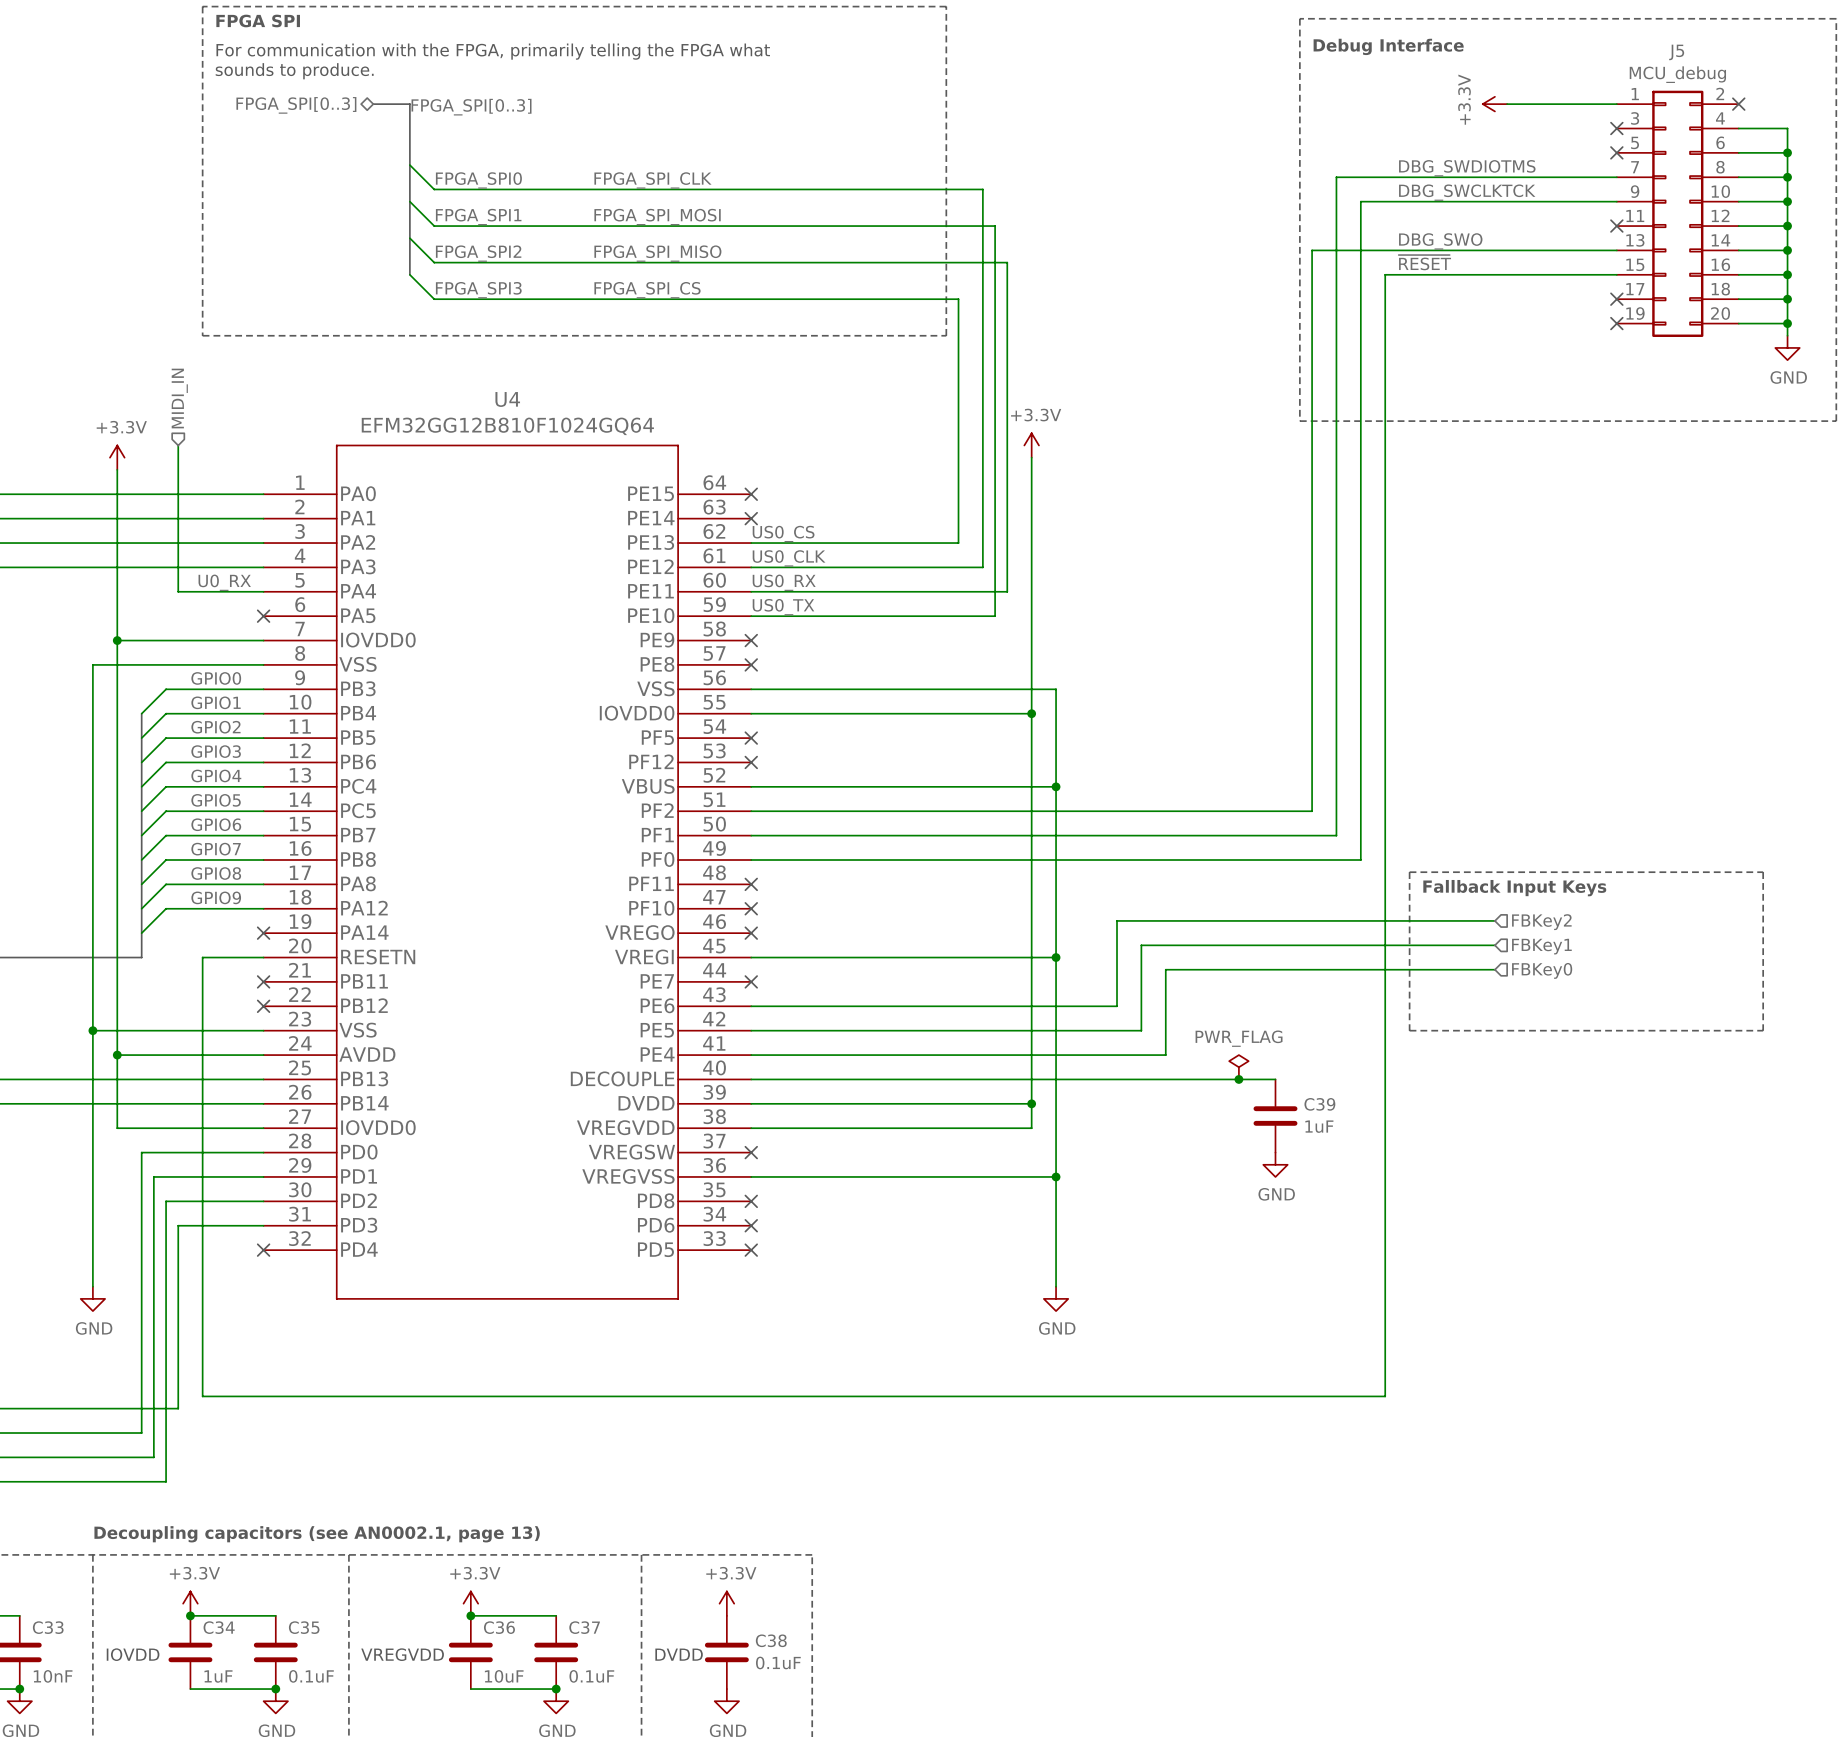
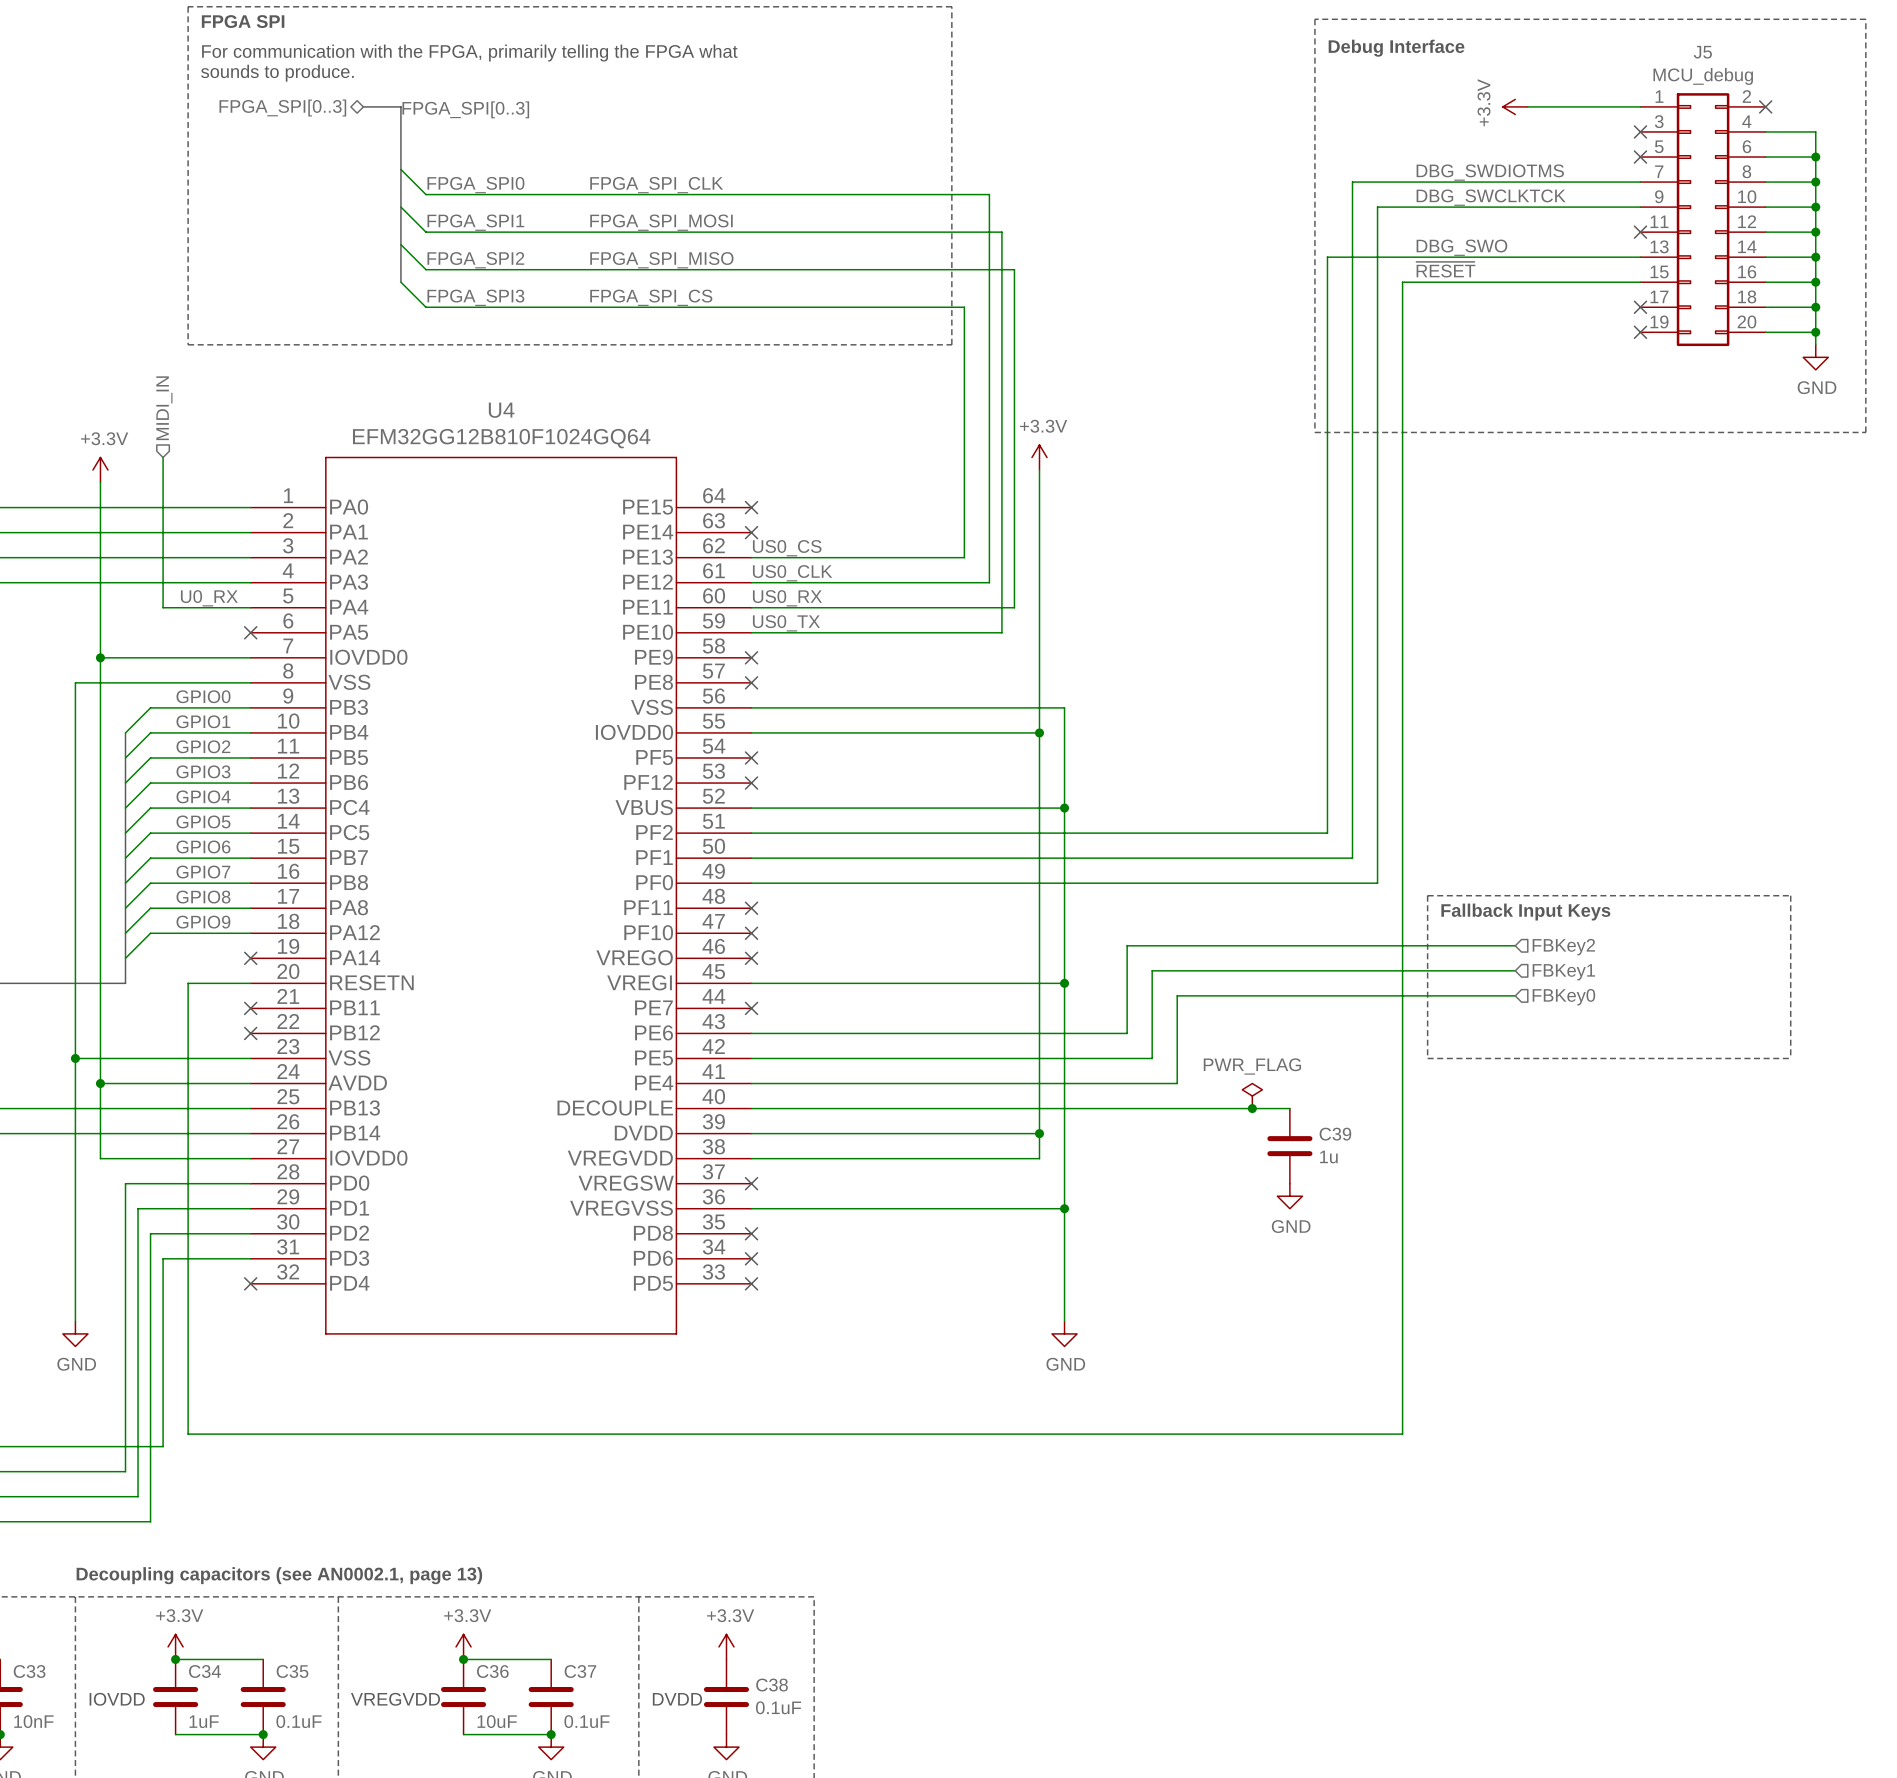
C39 value: 1uF (1319, 1126) -> 1u (1328, 1157)

